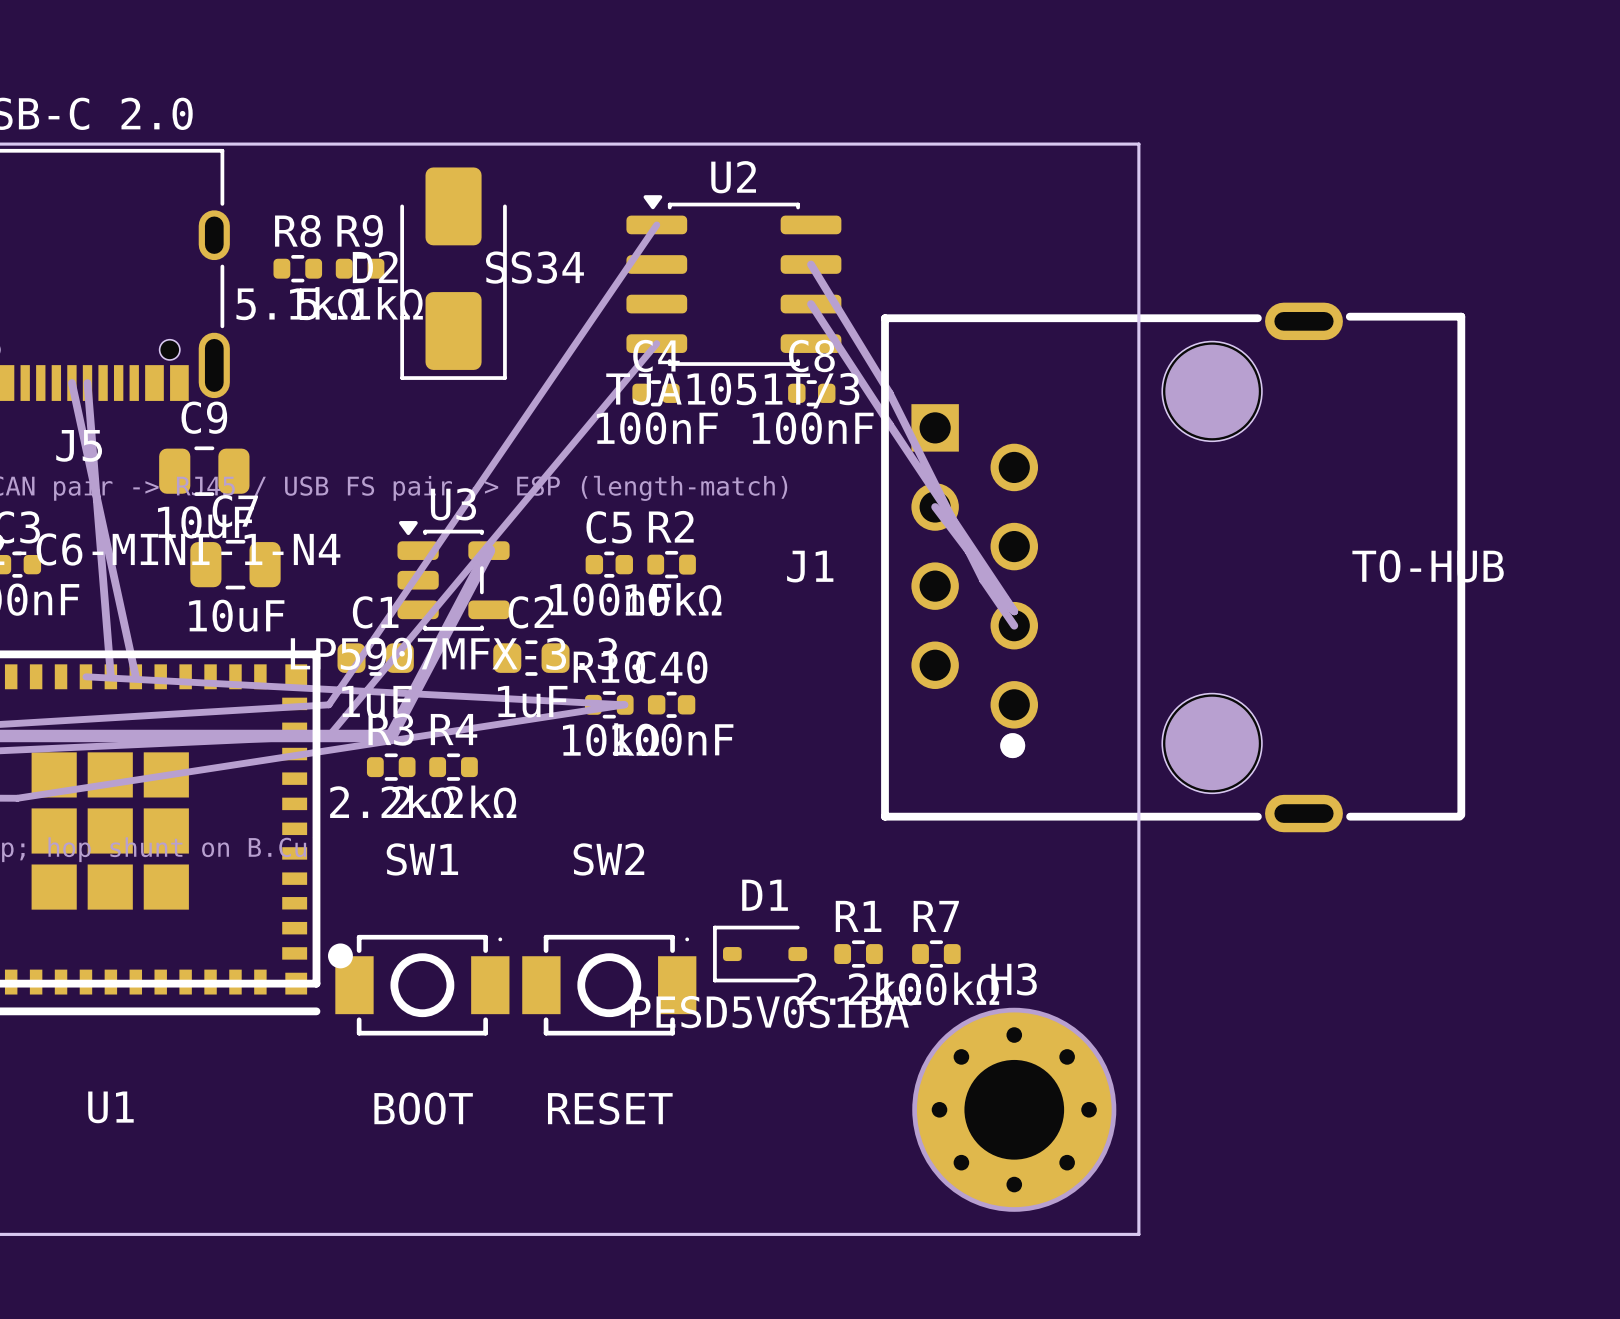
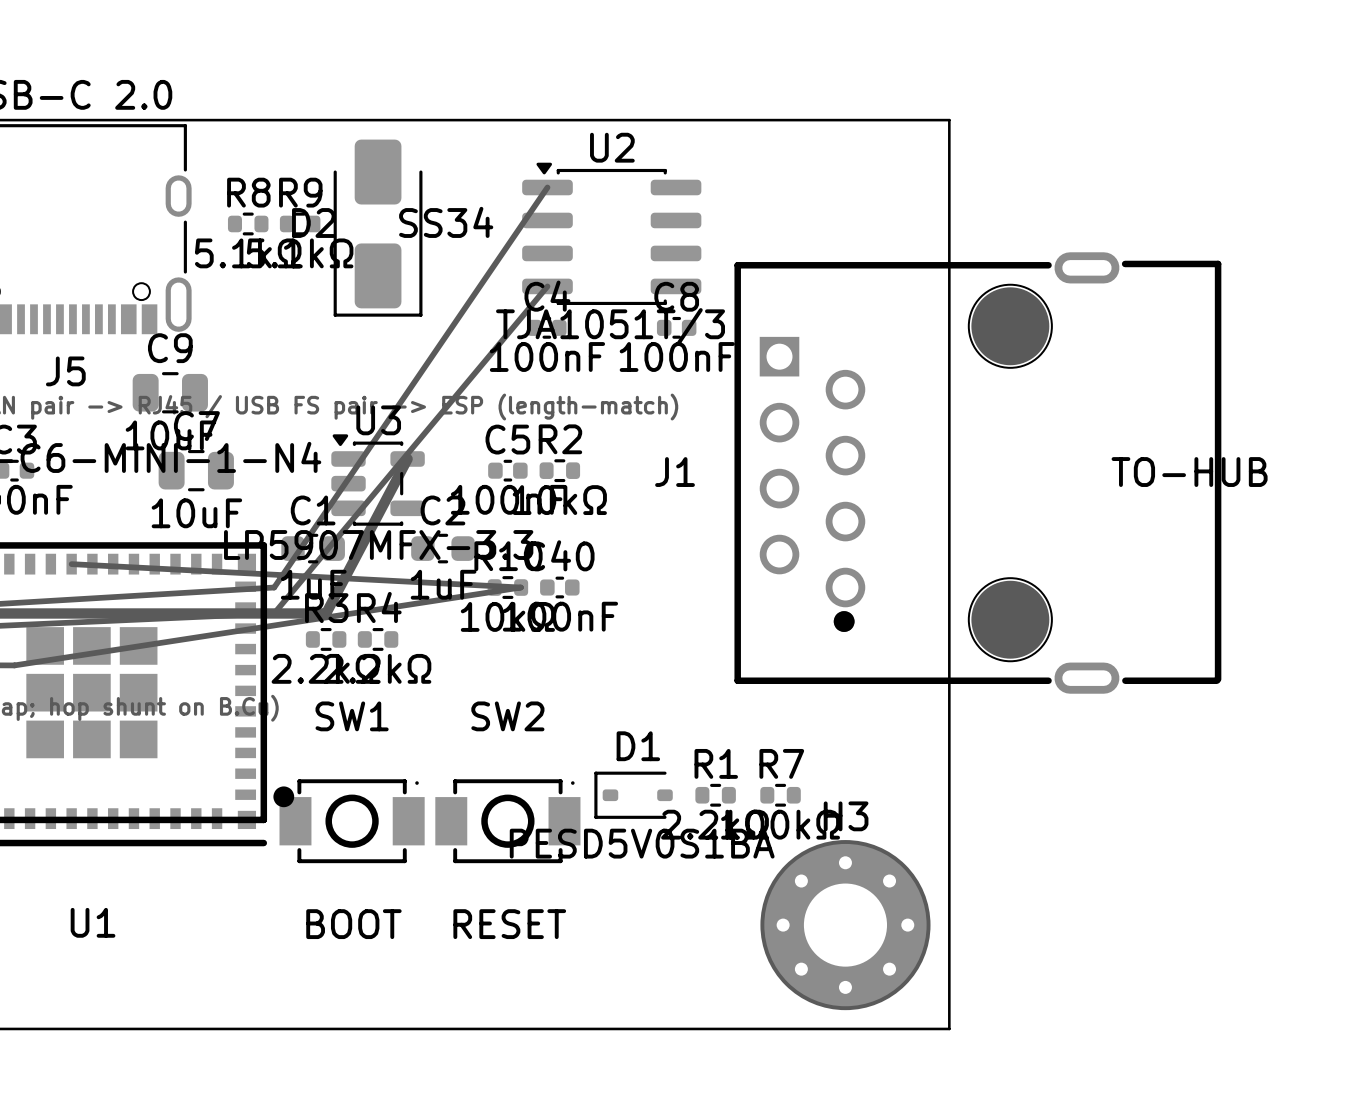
line: (811, 264) (889, 393) (983, 580) (1014, 625) -> none
line: (811, 304) (1014, 611) (935, 507) -> none
line: (71, 383) (135, 676) -> none
line: (87, 383) (110, 676) -> none

